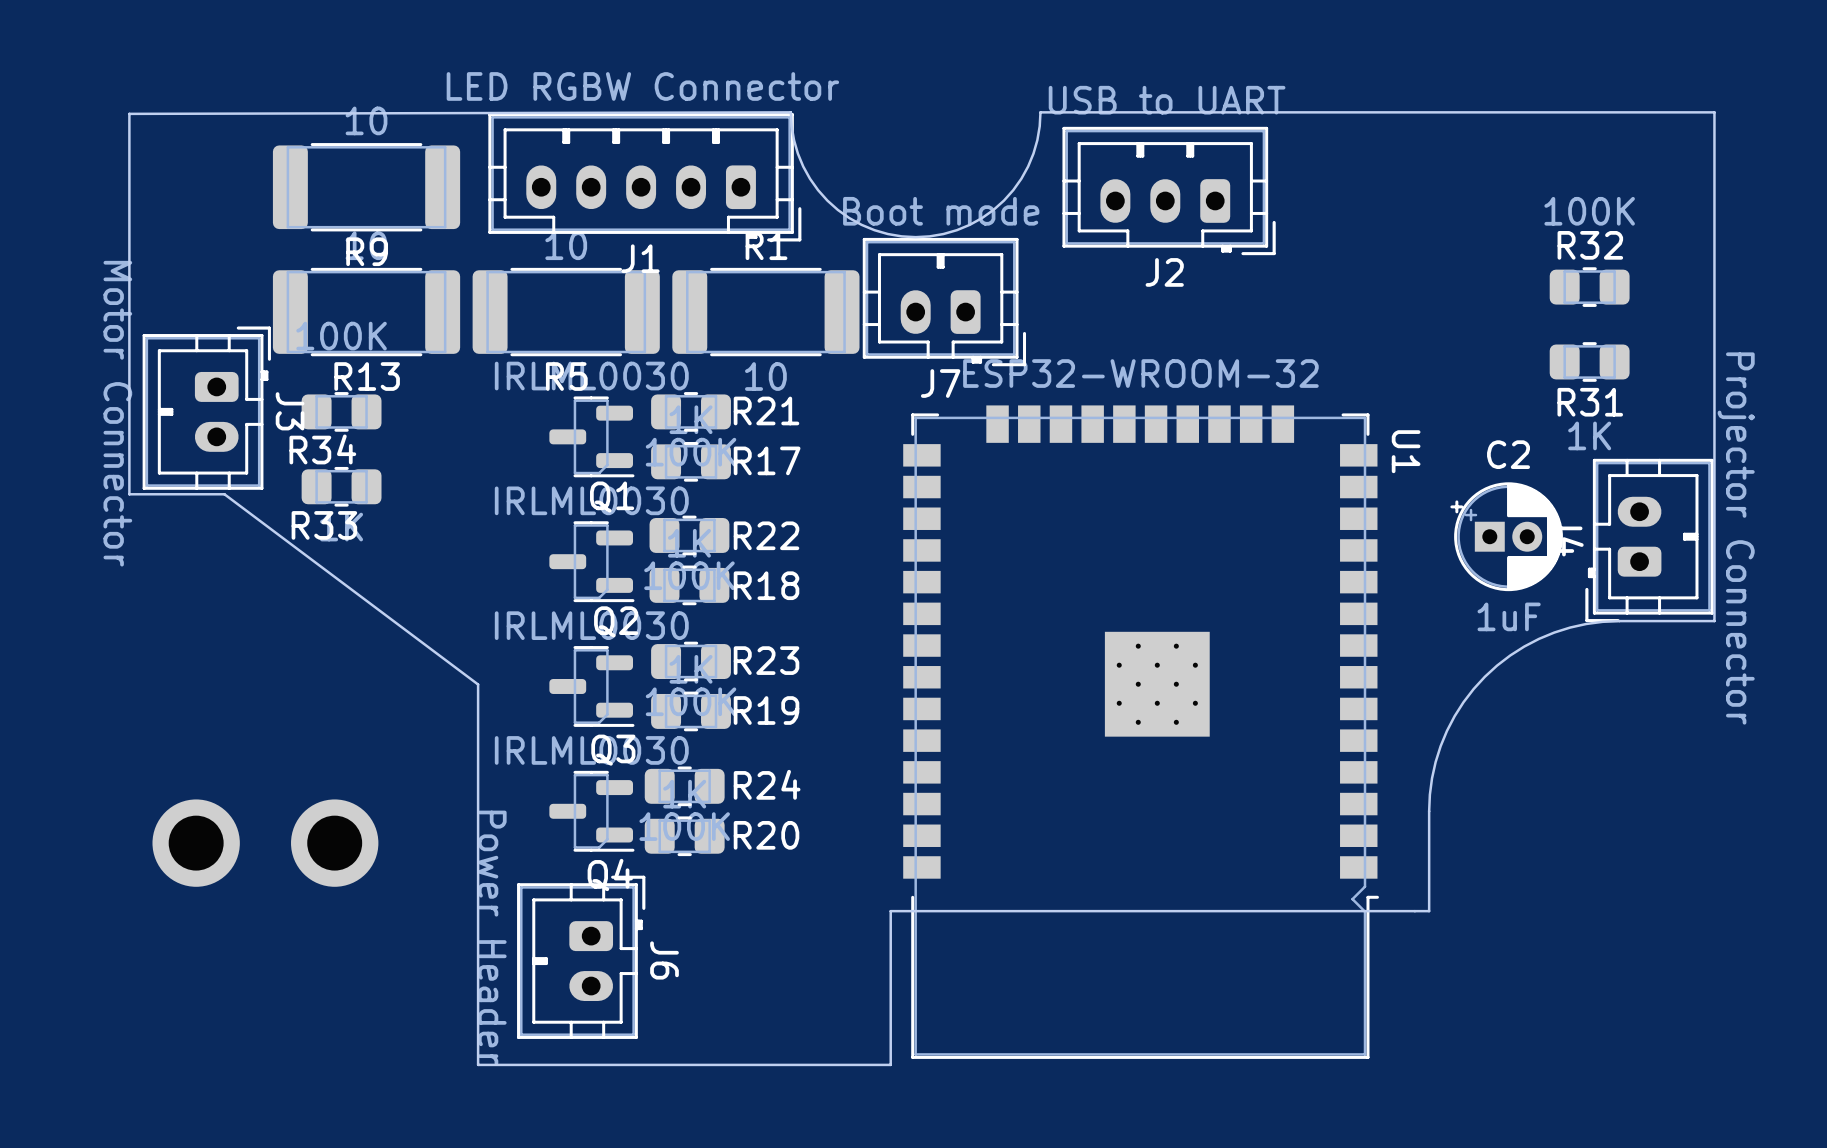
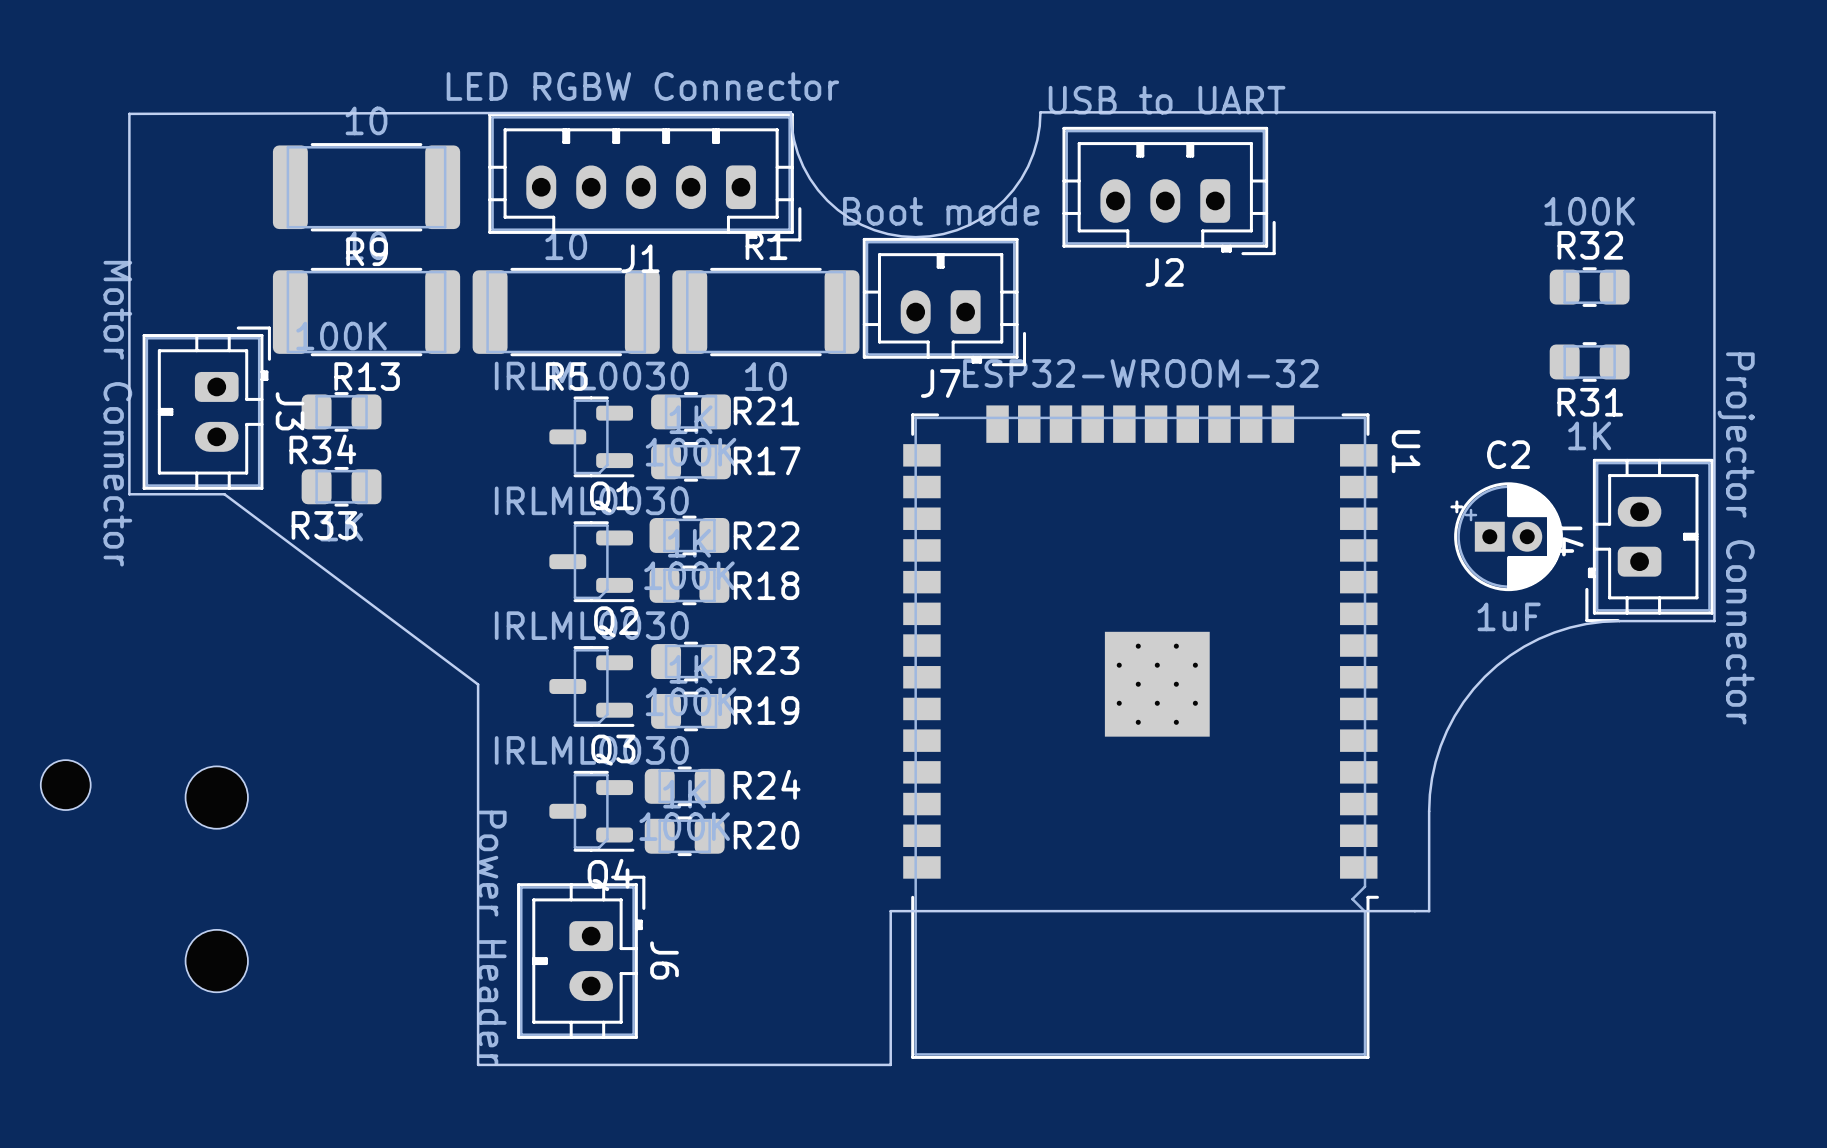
part: none -> (65, 785)
part: none -> (216, 797)
part: (196, 843) -> none
part: (334, 843) -> none
part: none -> (216, 961)

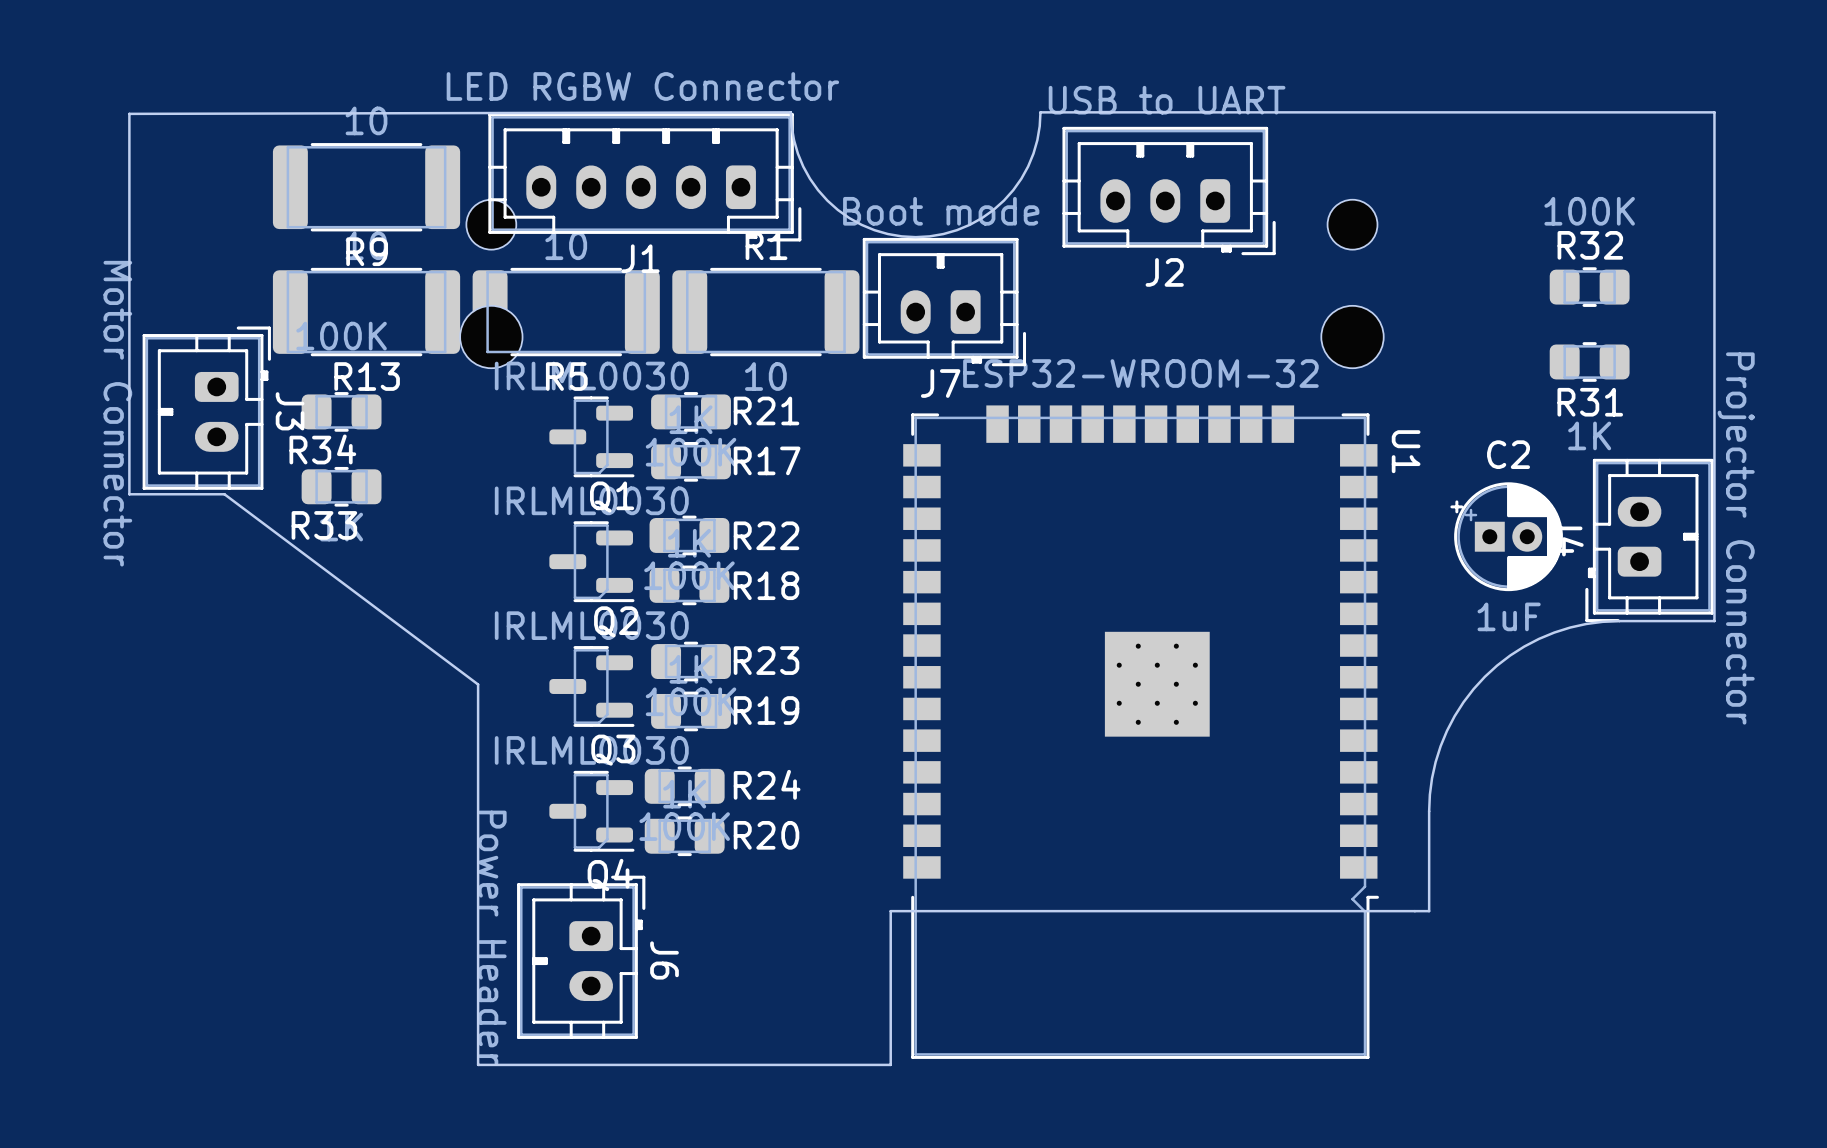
part: none -> (491, 224)
part: none -> (1352, 224)
part: none -> (491, 337)
part: none -> (1352, 337)
part: (65, 785) -> none
part: (216, 797) -> none
part: (216, 961) -> none

